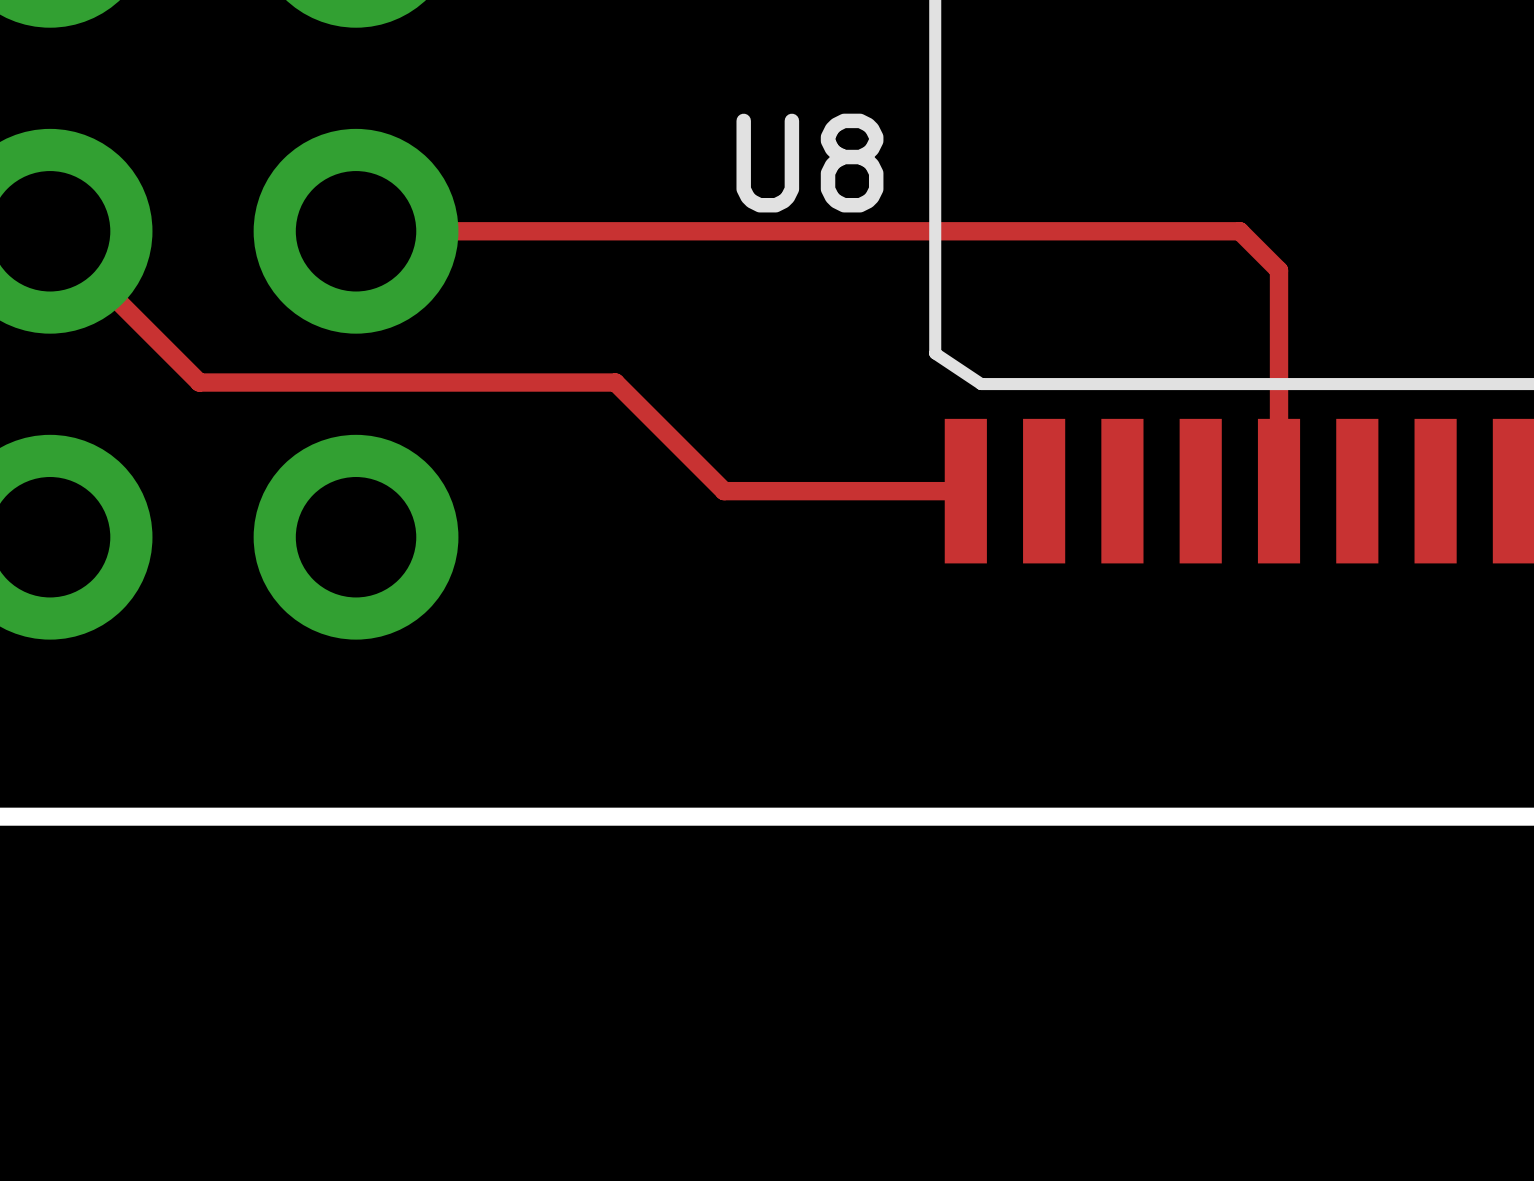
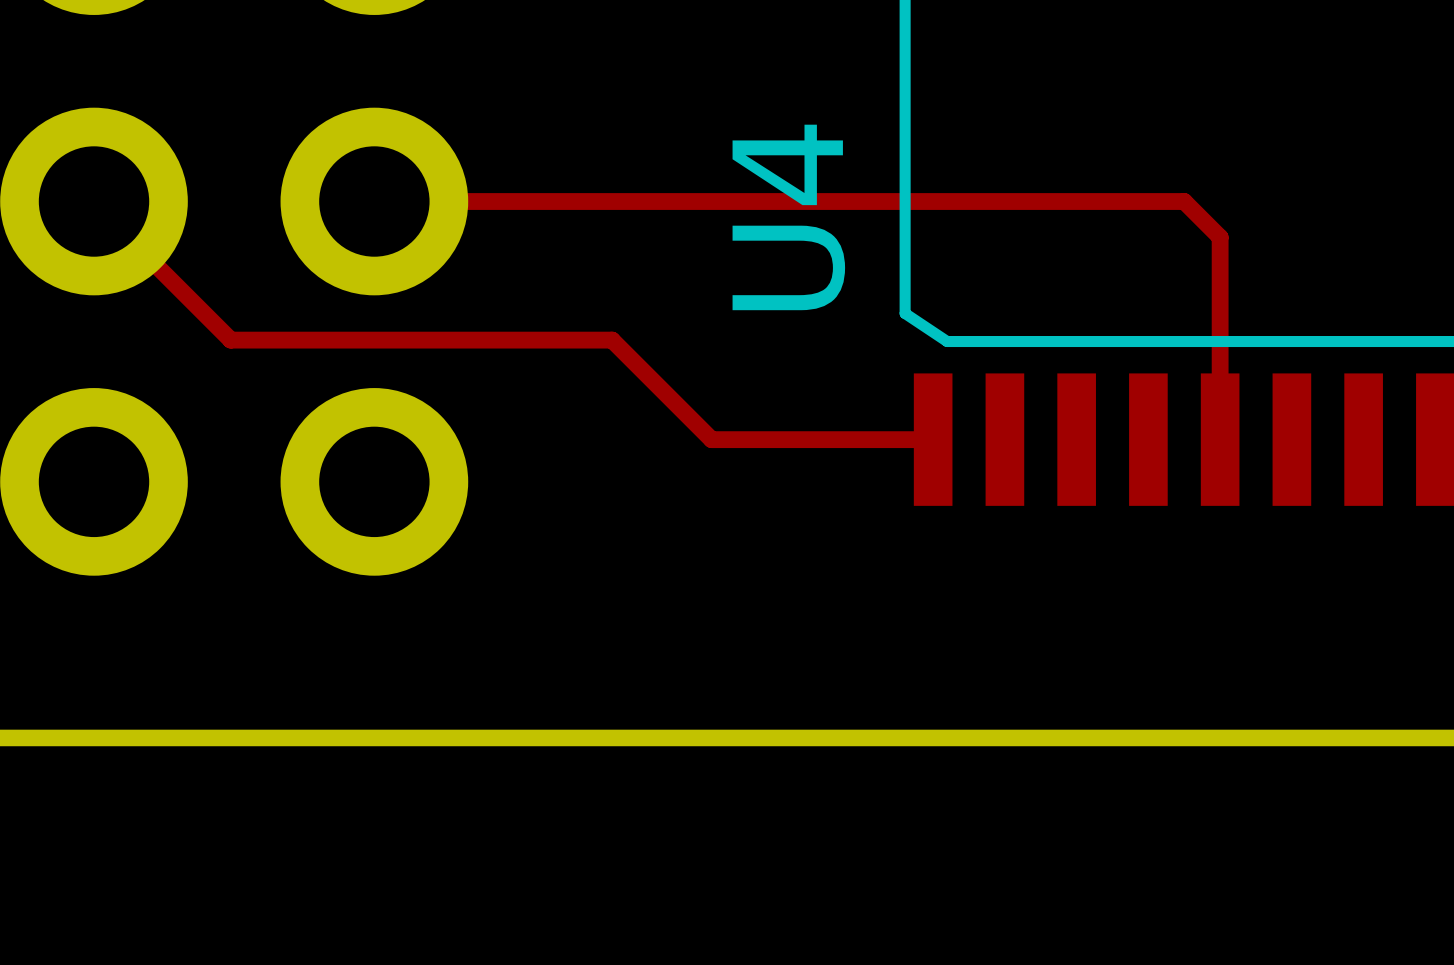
U8 name: U8 (809, 163) -> U4 (788, 217)

